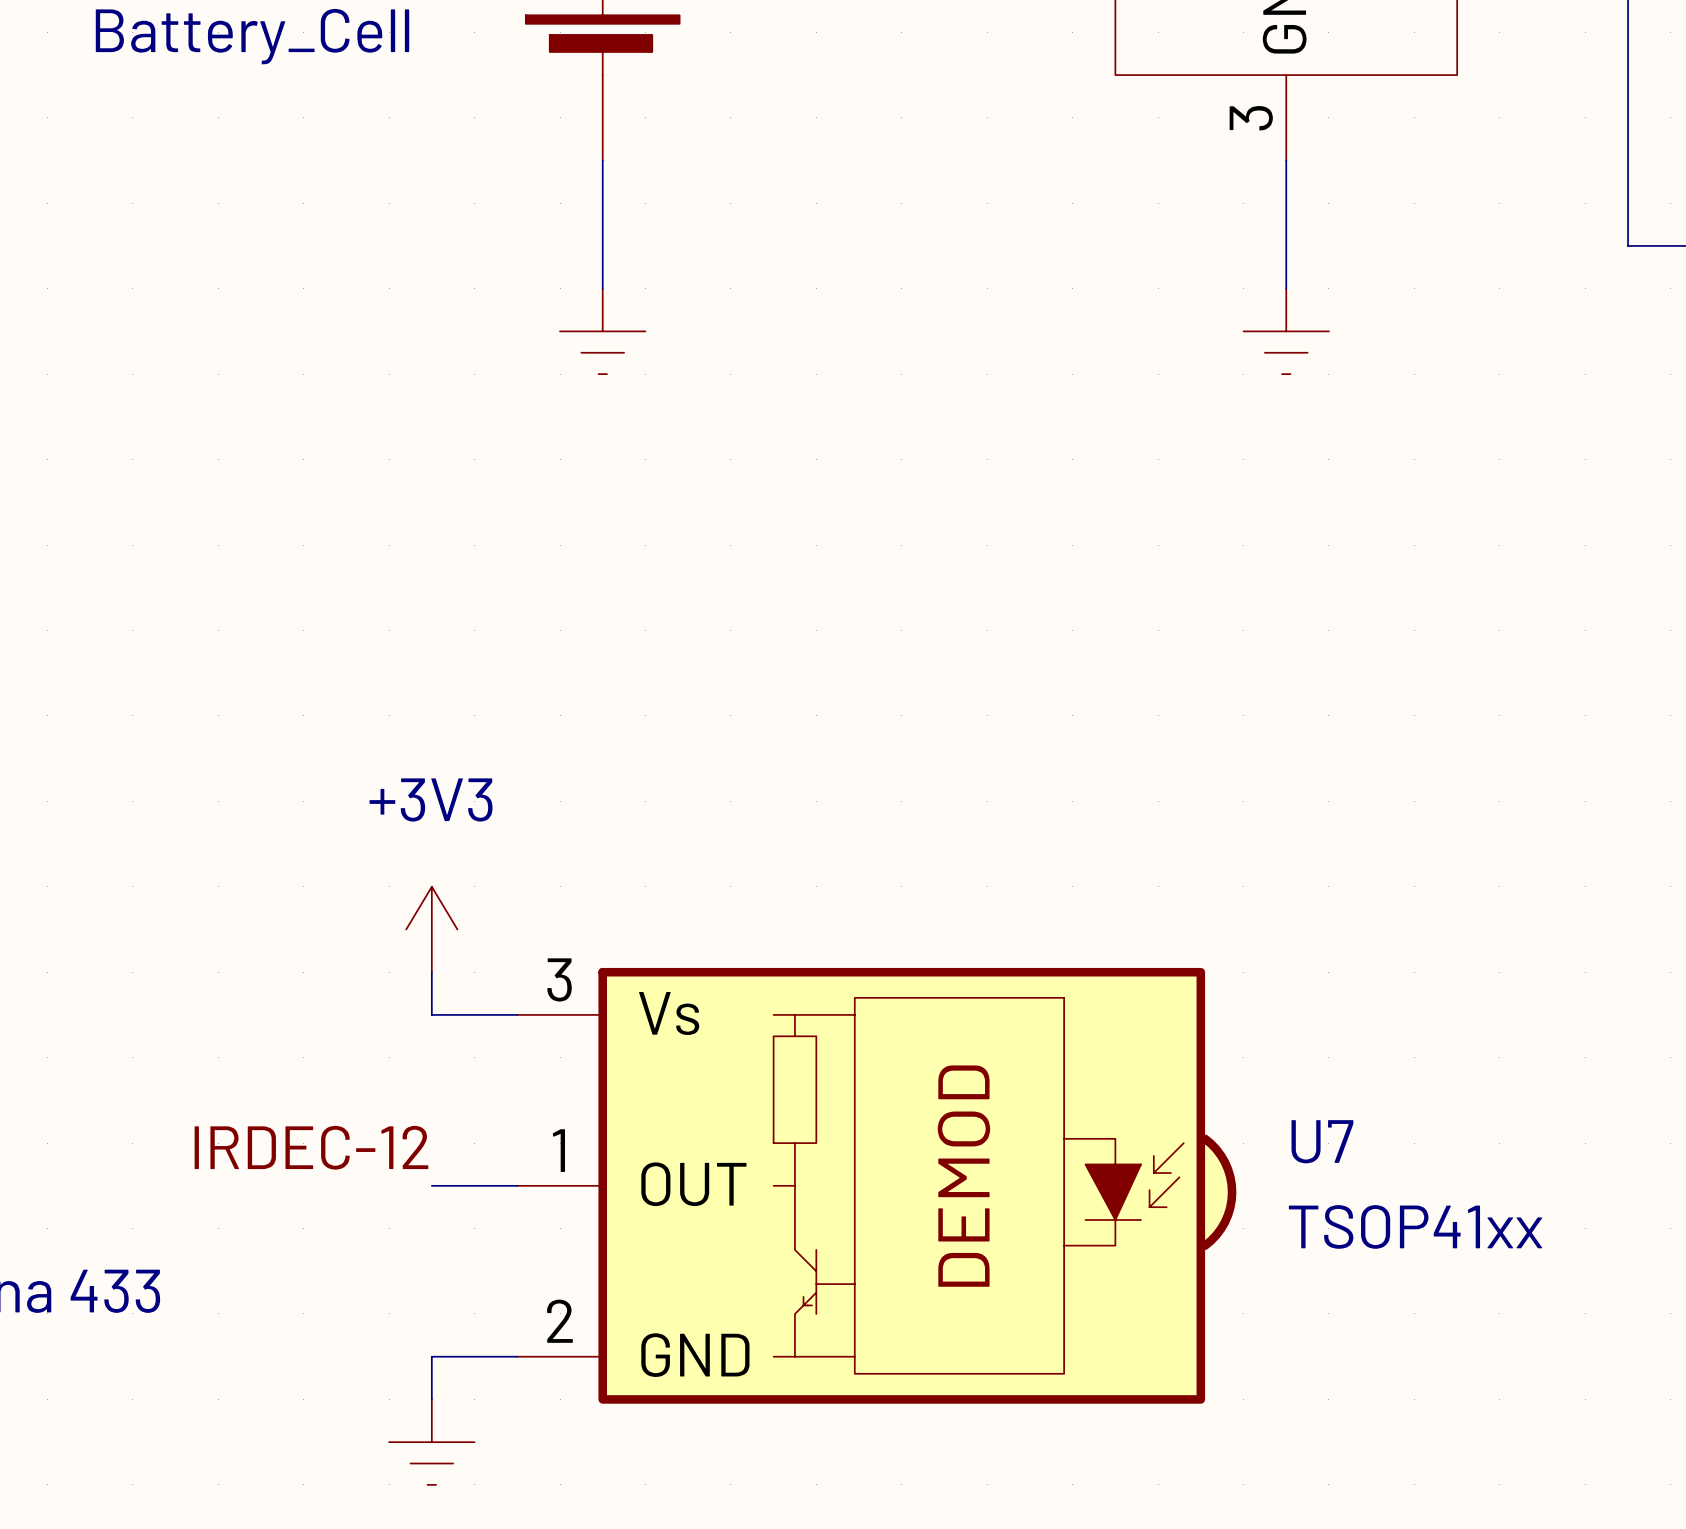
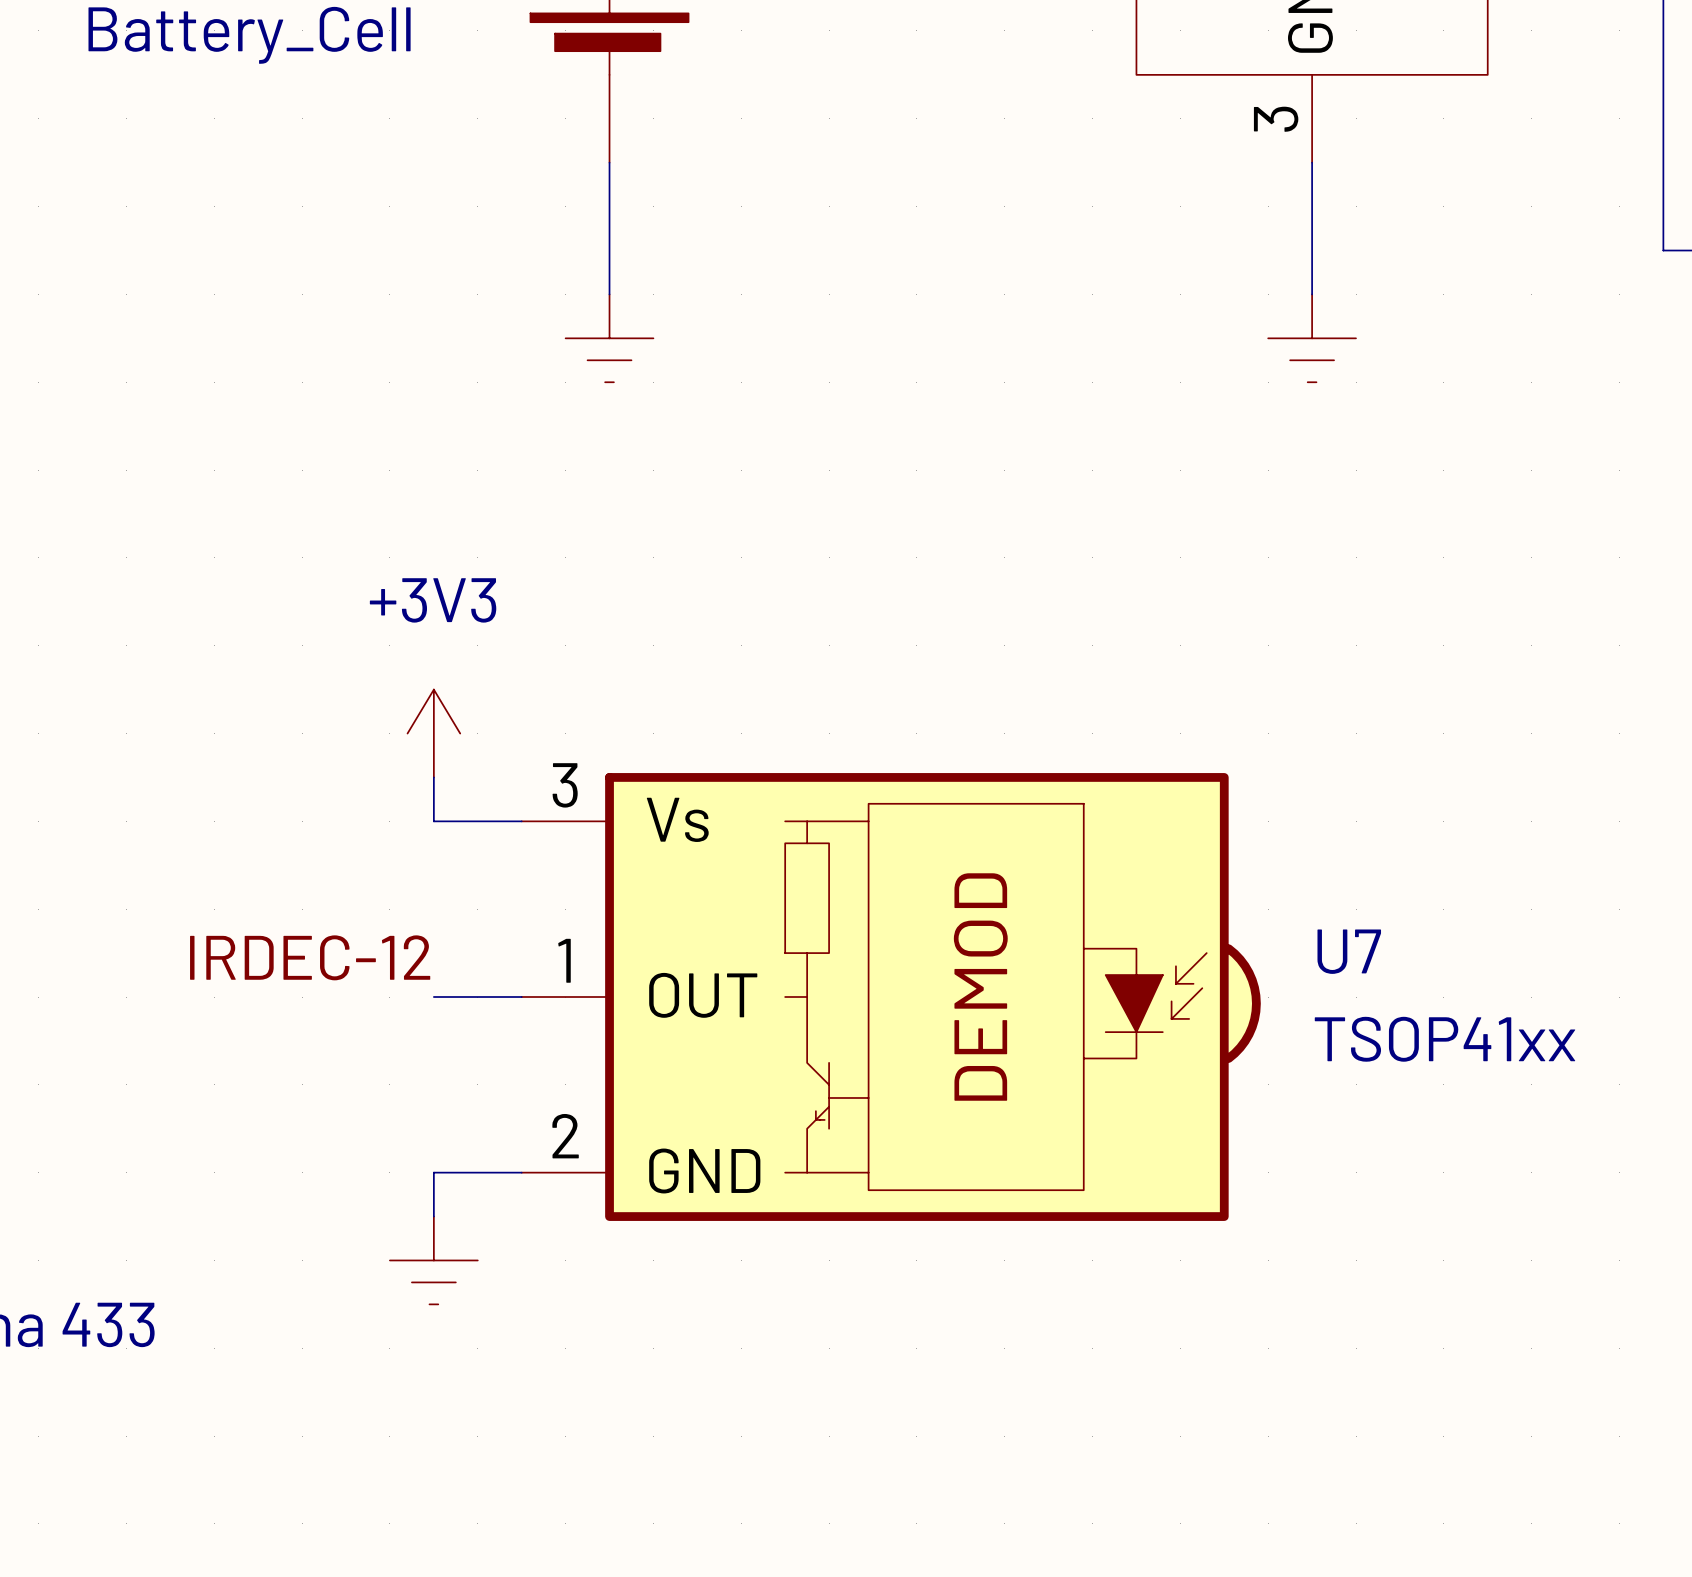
wire: none -> (433, 777) (433, 821) (521, 821)
power symbol position: +3V3 (431, 929) -> +3V3 (433, 733)
wire: (431, 972) (431, 1014) (517, 1014) -> (433, 997) (521, 997)
label position: IRDEC-12 (311, 1147) -> IRDEC-12 (310, 957)
wire: (431, 1185) (517, 1185) -> (433, 1216) (433, 1172) (521, 1172)
U7 position: (876, 1185) -> (891, 997)
wire: (517, 1356) (431, 1356) (431, 1399) -> none
power symbol position: (431, 1442) -> (433, 1260)

